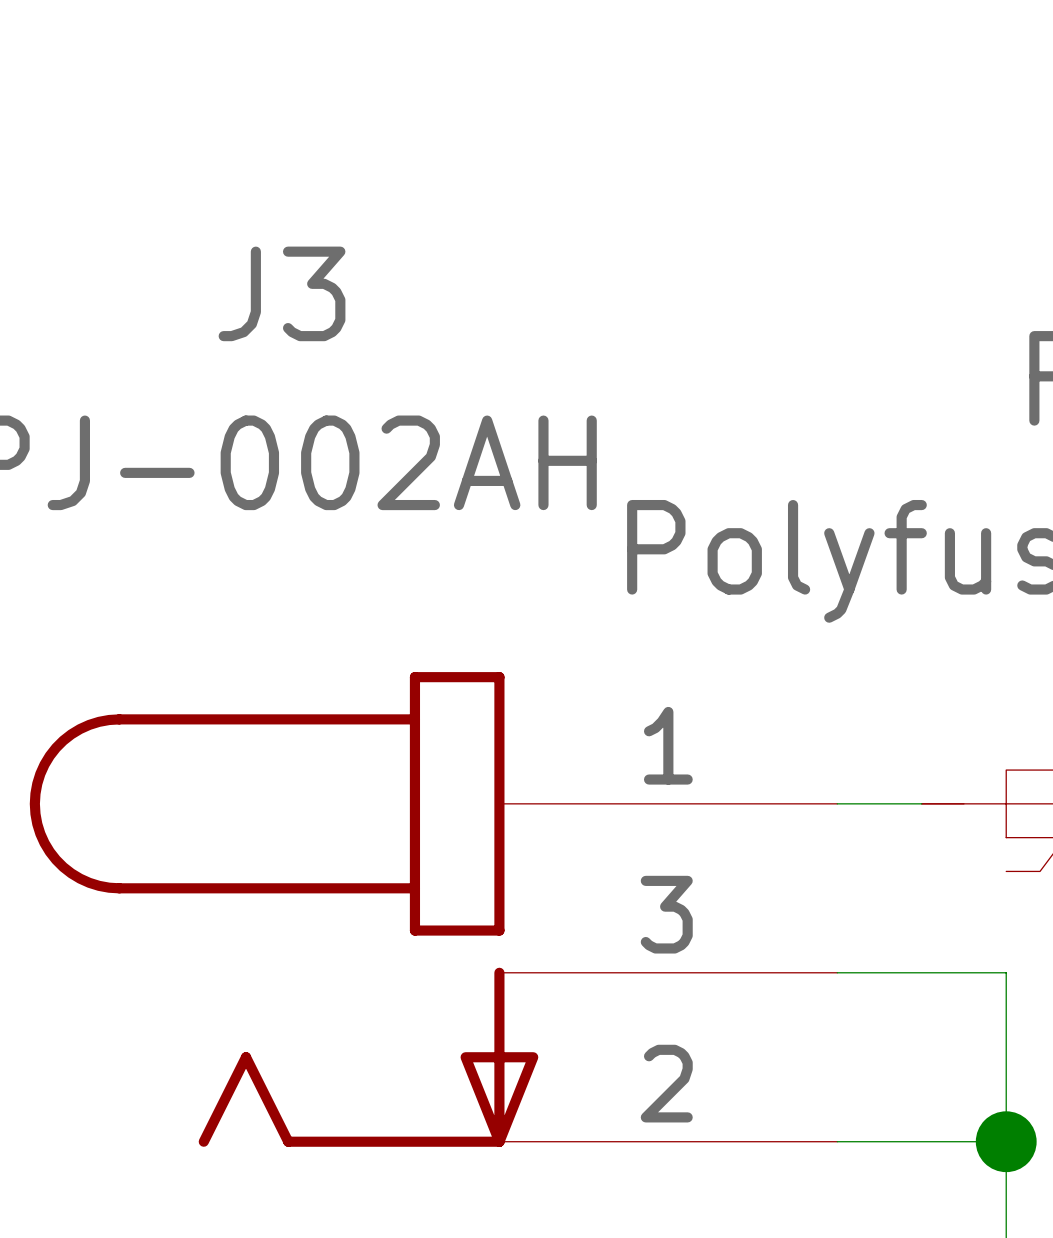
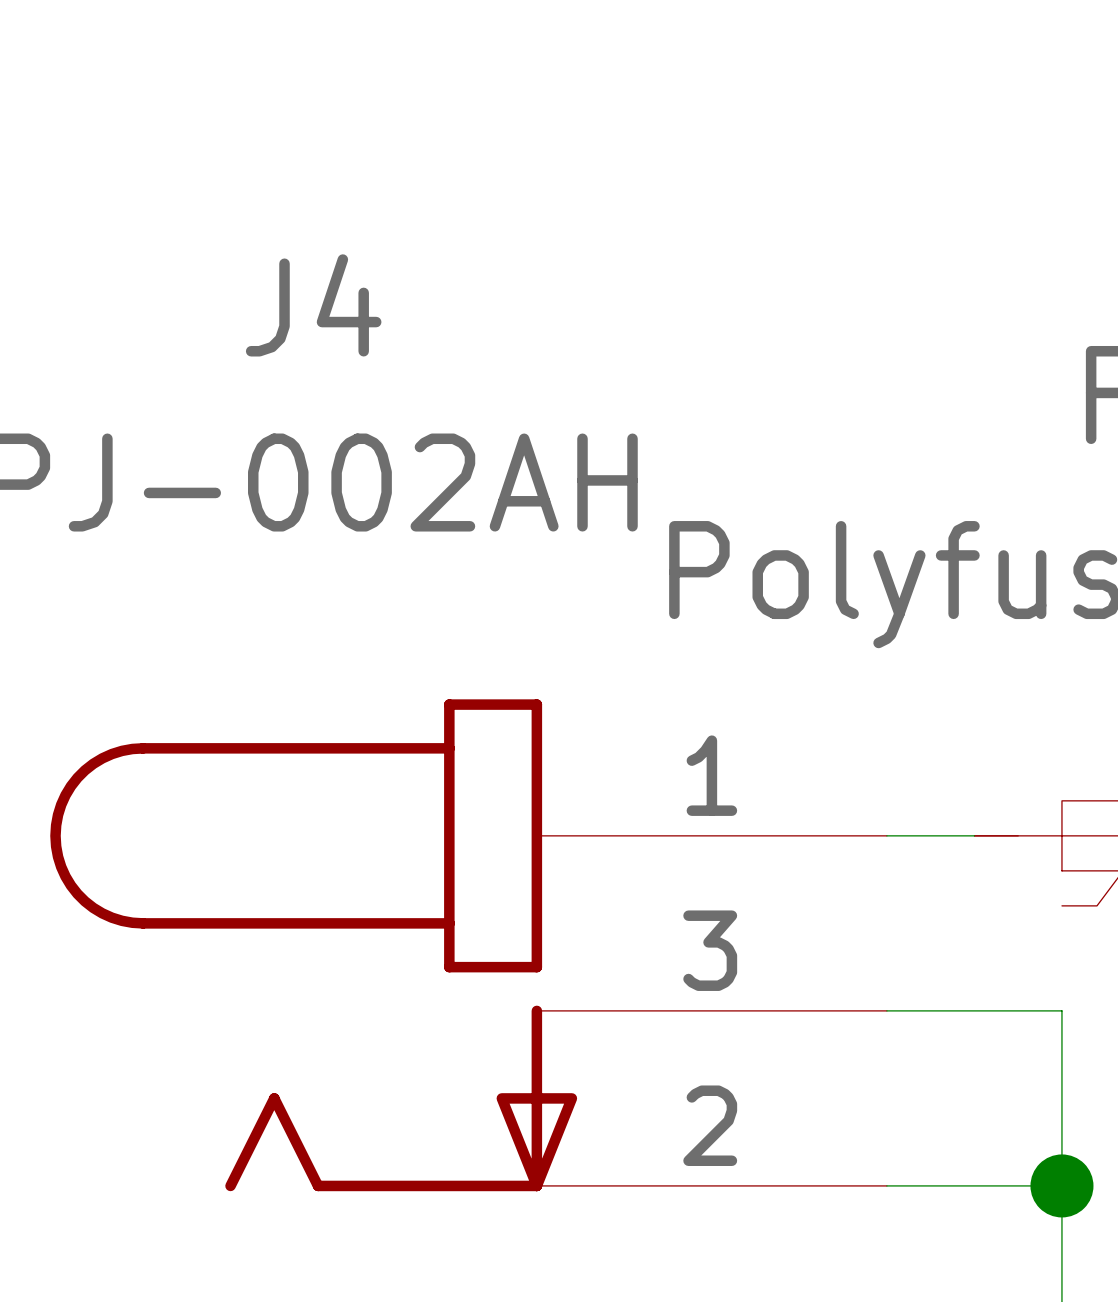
J3 name: J3 (282, 293) -> J4 (313, 305)

